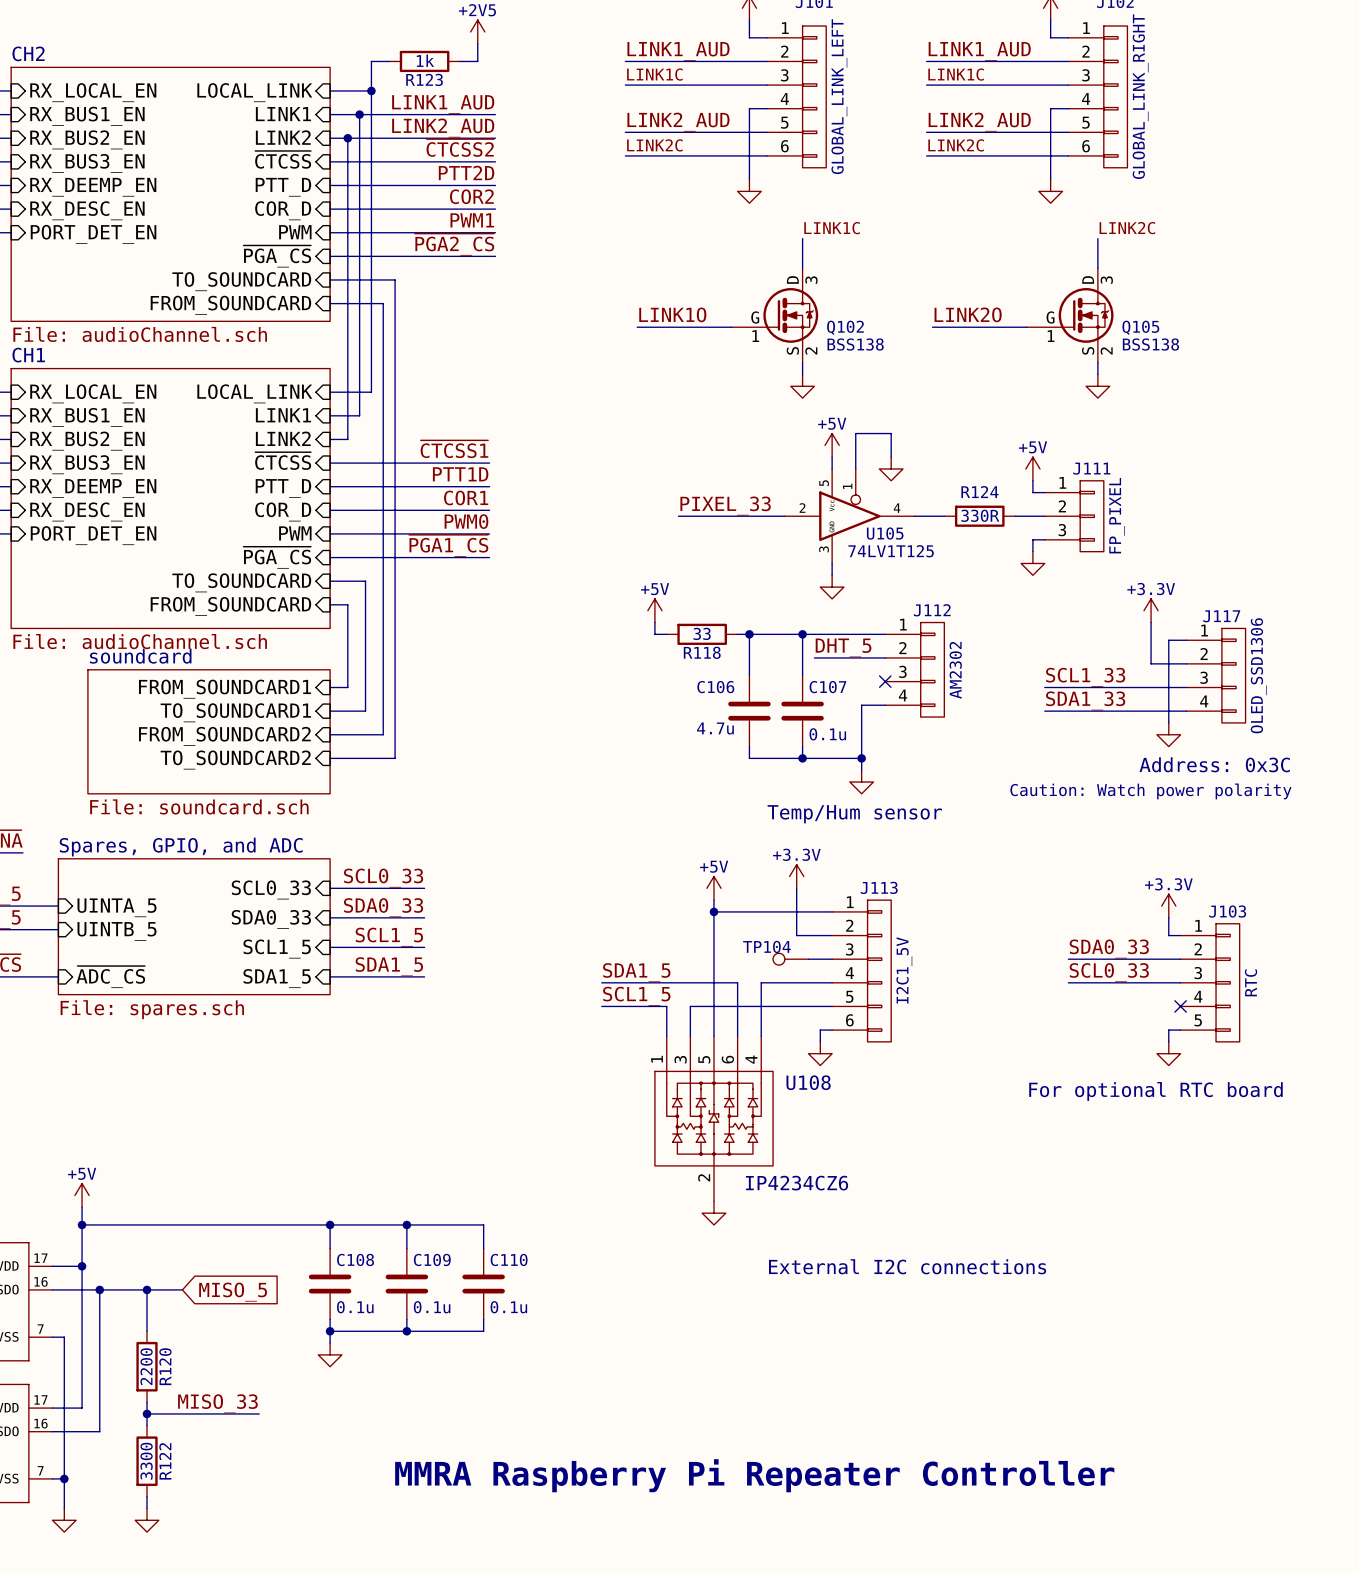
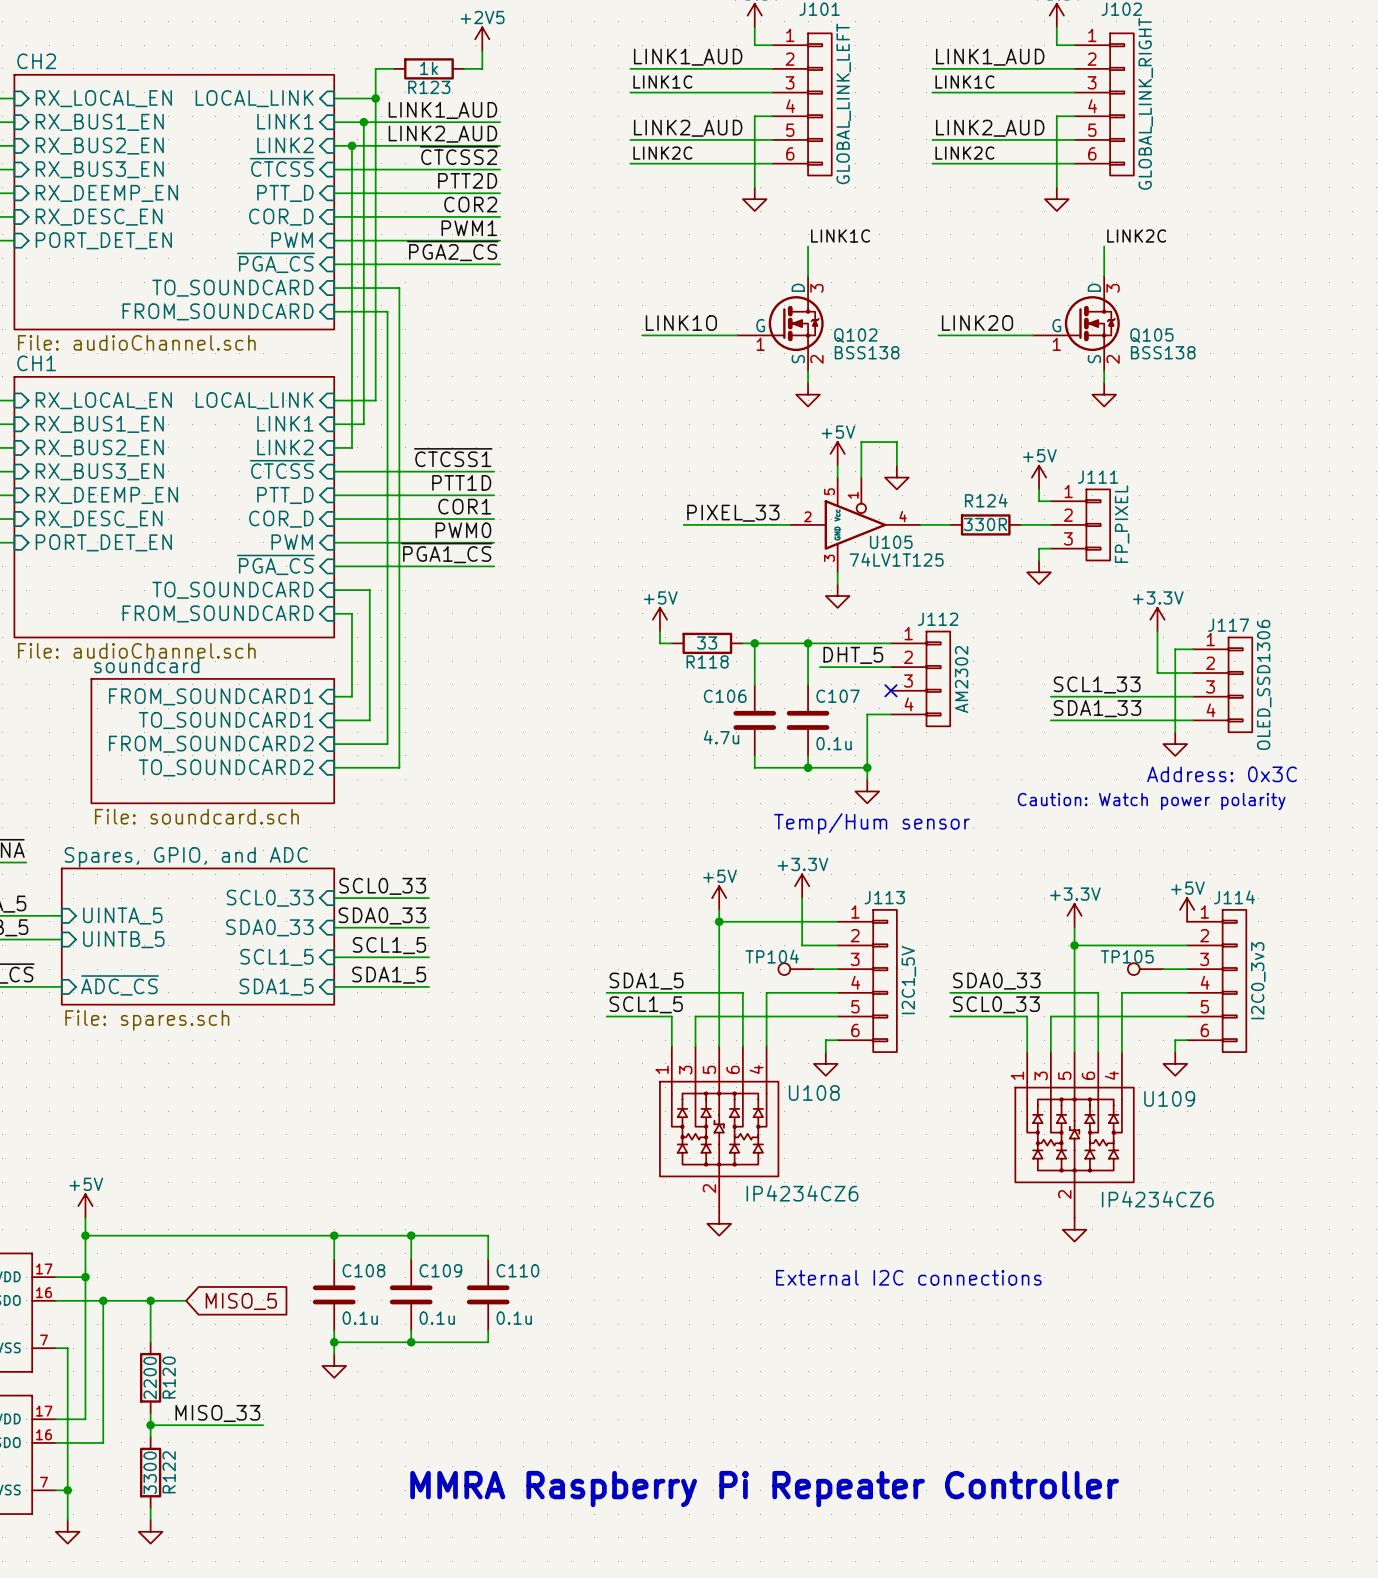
power symbol: none -> +5V (1187, 909)
power symbol position: +3.3V (1168, 906) -> +3.3V (1074, 915)
wire: none -> (1074, 927) (1074, 1052)
wire: (1168, 917) (1168, 935) -> (1074, 945) (1175, 945)
junction: none -> (1074, 945)
label position: SDA0_33 (1109, 948) -> SDA0_33 (996, 981)
wire: (1068, 959) (1156, 959) -> none
TP105: none -> (1145, 969)
J114: none -> I2C0_3v3 (1216, 980)
label position: SCL0_33 (1109, 972) -> SCL0_33 (996, 1004)
wire: none -> (950, 992) (1074, 992)
wire: (1091, 982) (1115, 982) -> (1098, 992) (1098, 1052)
wire: none -> (1121, 992) (1121, 1052)
J103: RTC (1210, 982) -> none
wire: none -> (950, 1016) (1027, 1016) (1027, 1052)
wire: none -> (1187, 1016) (1050, 1016) (1050, 1052)
no-connect mark: (1180, 1006) -> none
text: For optional RTC board (1155, 1091) -> none
U109: none -> IP4234CZ6 (1074, 1134)
power symbol: none -> (1074, 1229)

